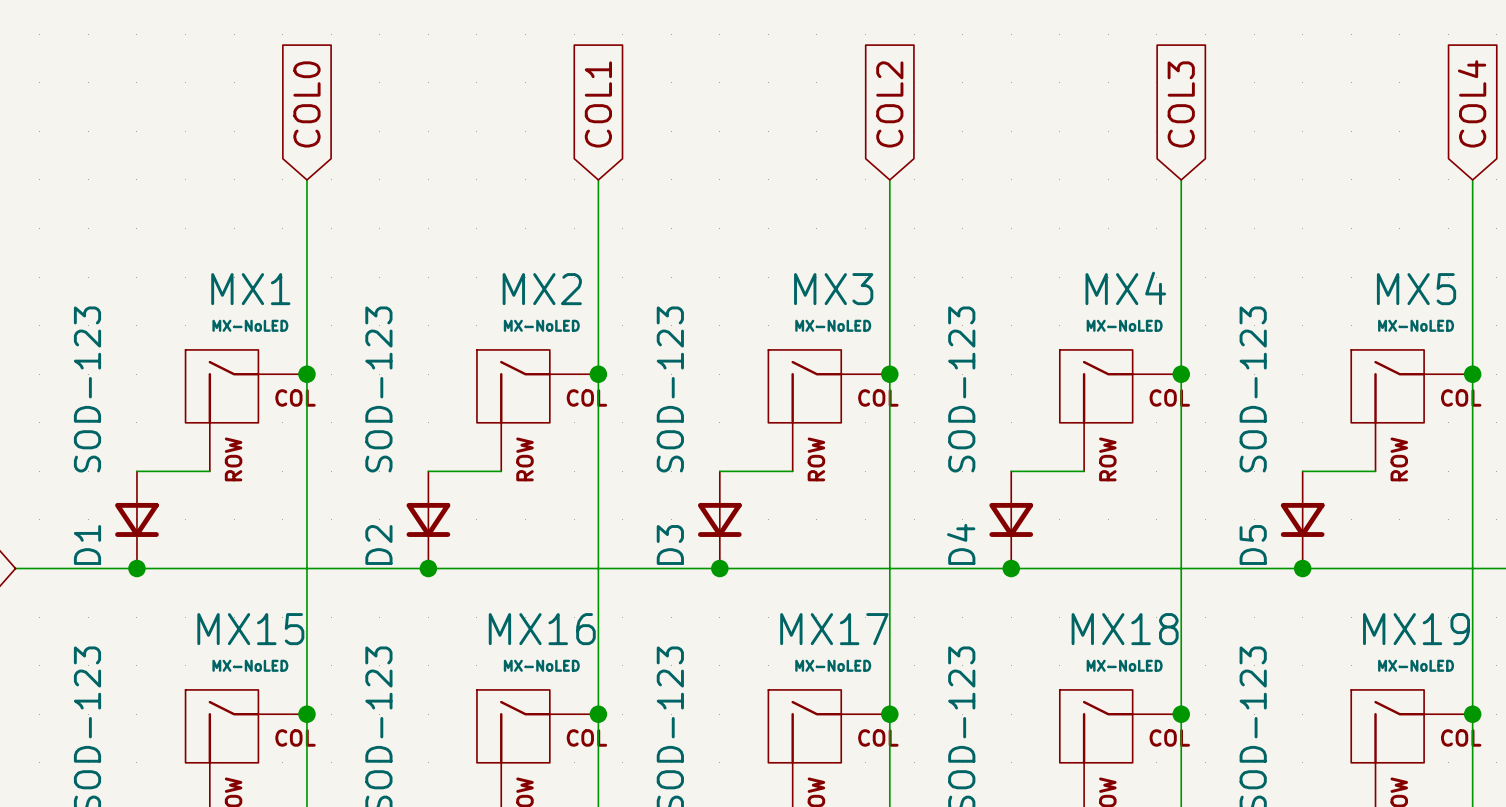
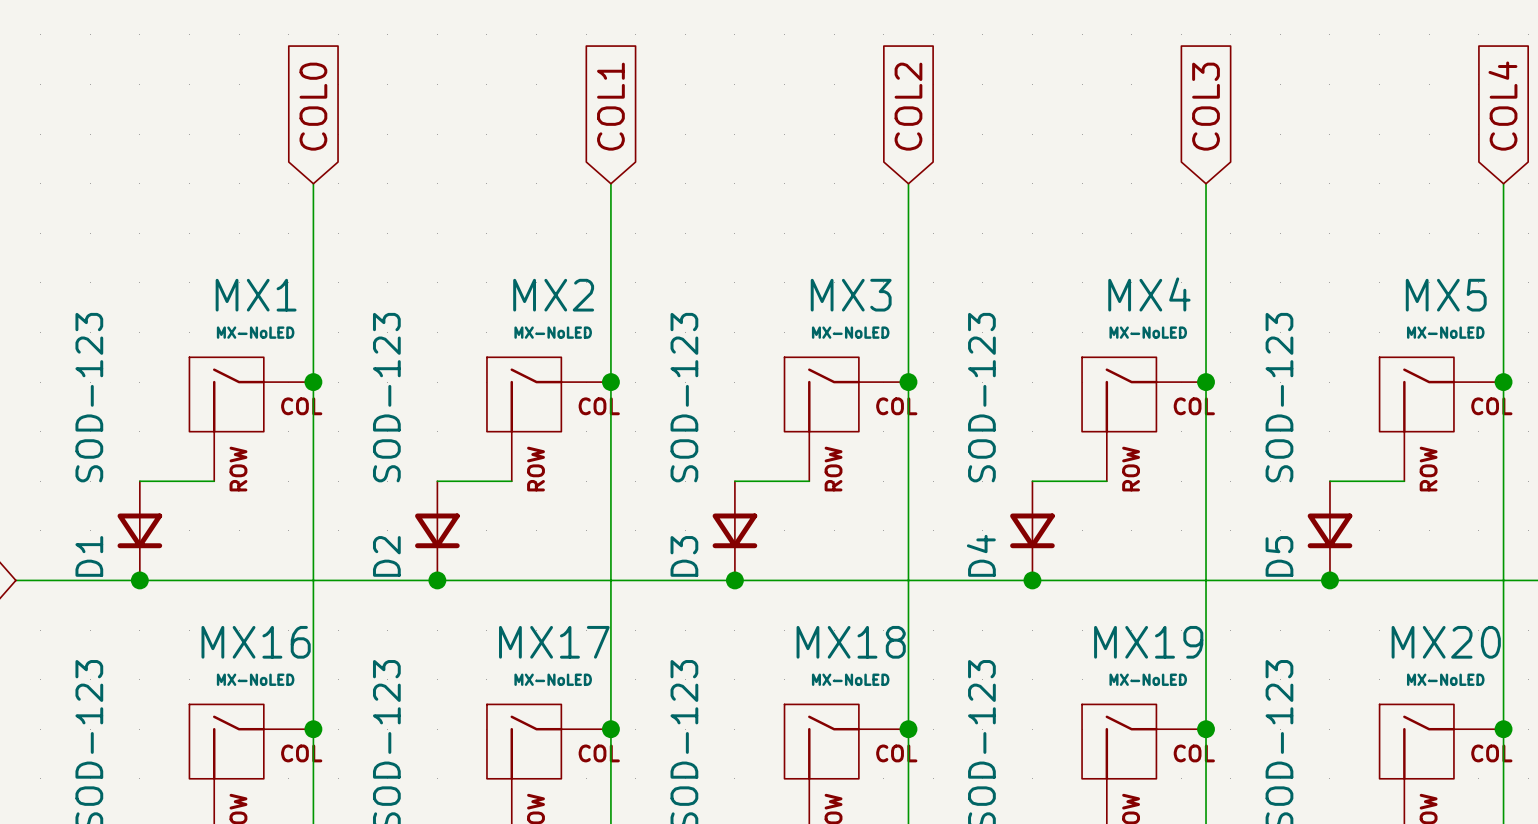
MX15 name: MX15 (250, 629) -> MX16 (256, 642)
MX16 name: MX16 (542, 629) -> MX17 (554, 642)
MX17 name: MX17 (834, 629) -> MX18 (851, 642)
MX18 name: MX18 (1125, 629) -> MX19 (1148, 642)
MX19 name: MX19 (1416, 629) -> MX20 (1446, 642)

